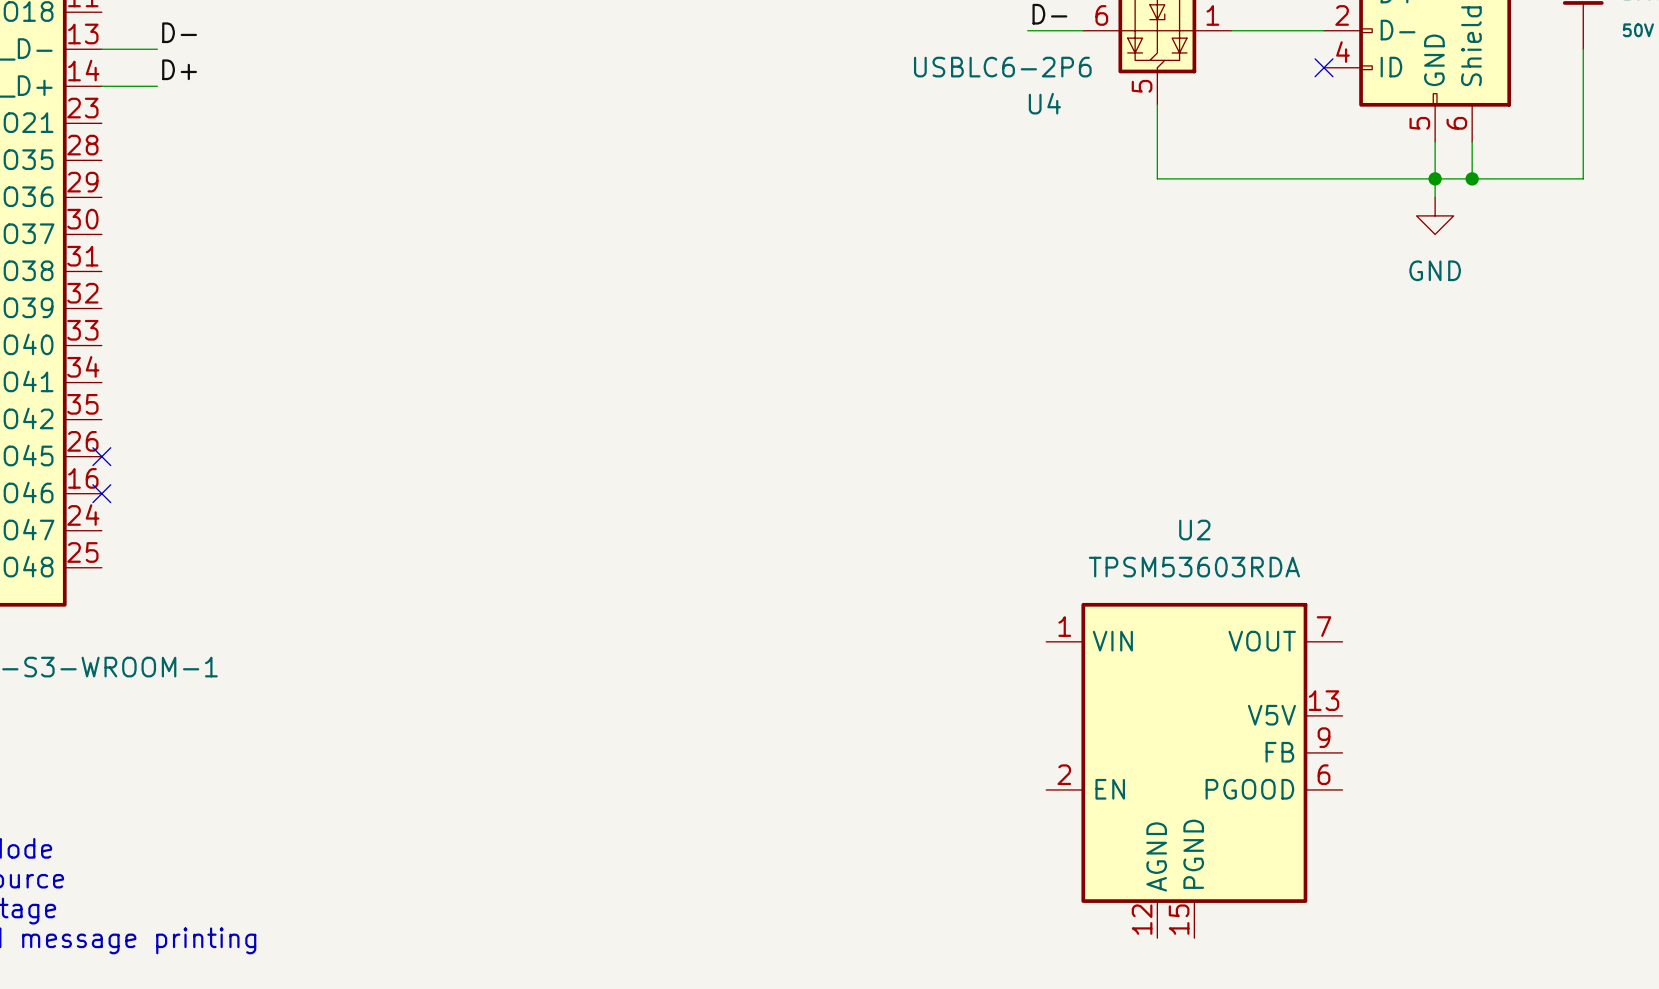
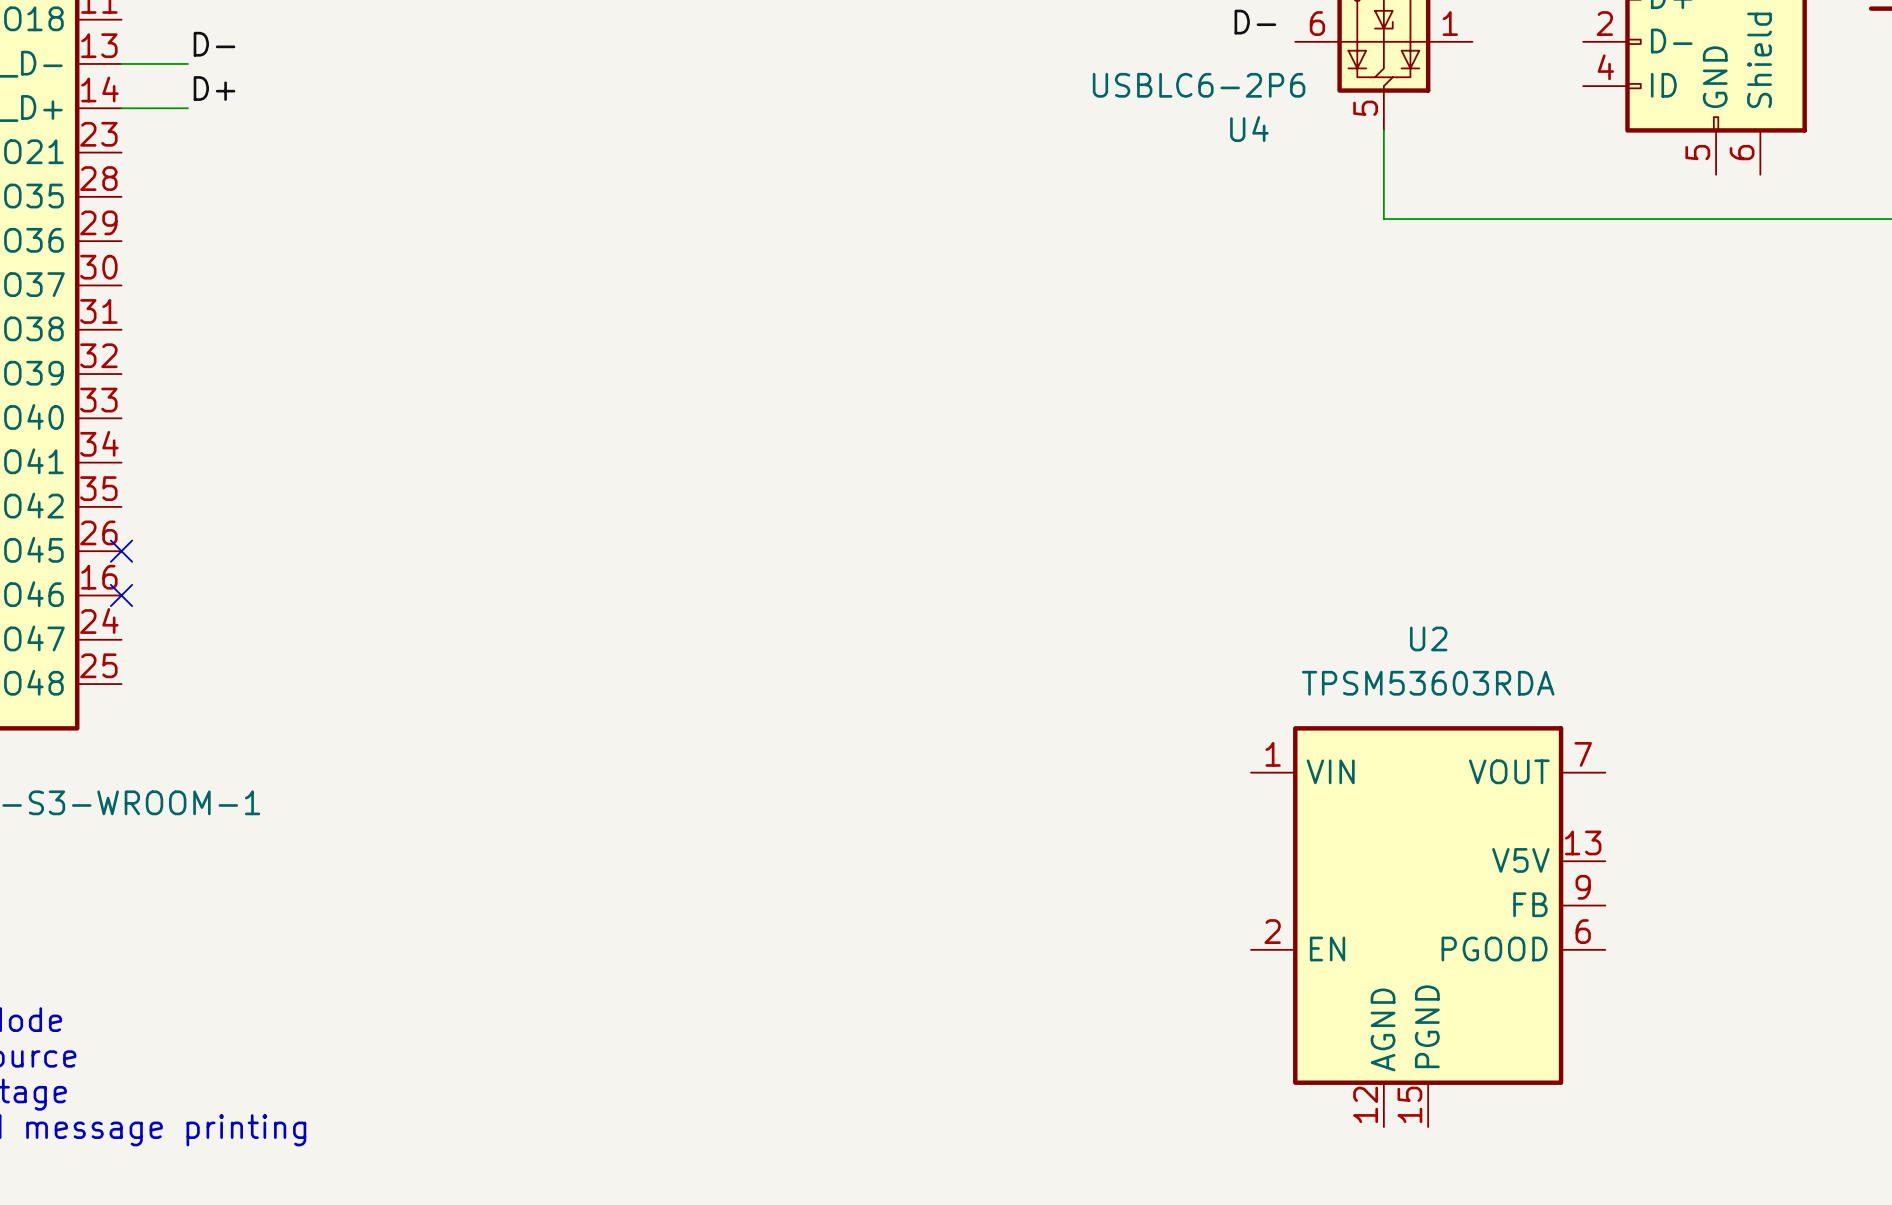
wire: (1027, 30) (1083, 30) -> none
wire: (1231, 30) (1324, 30) -> none
no-connect mark: (1324, 67) -> none
wire: (1435, 141) (1435, 197) -> none
wire: (1472, 141) (1472, 178) -> none
junction: (1435, 178) -> none
junction: (1472, 178) -> none
power symbol: GND (1435, 215) -> none

